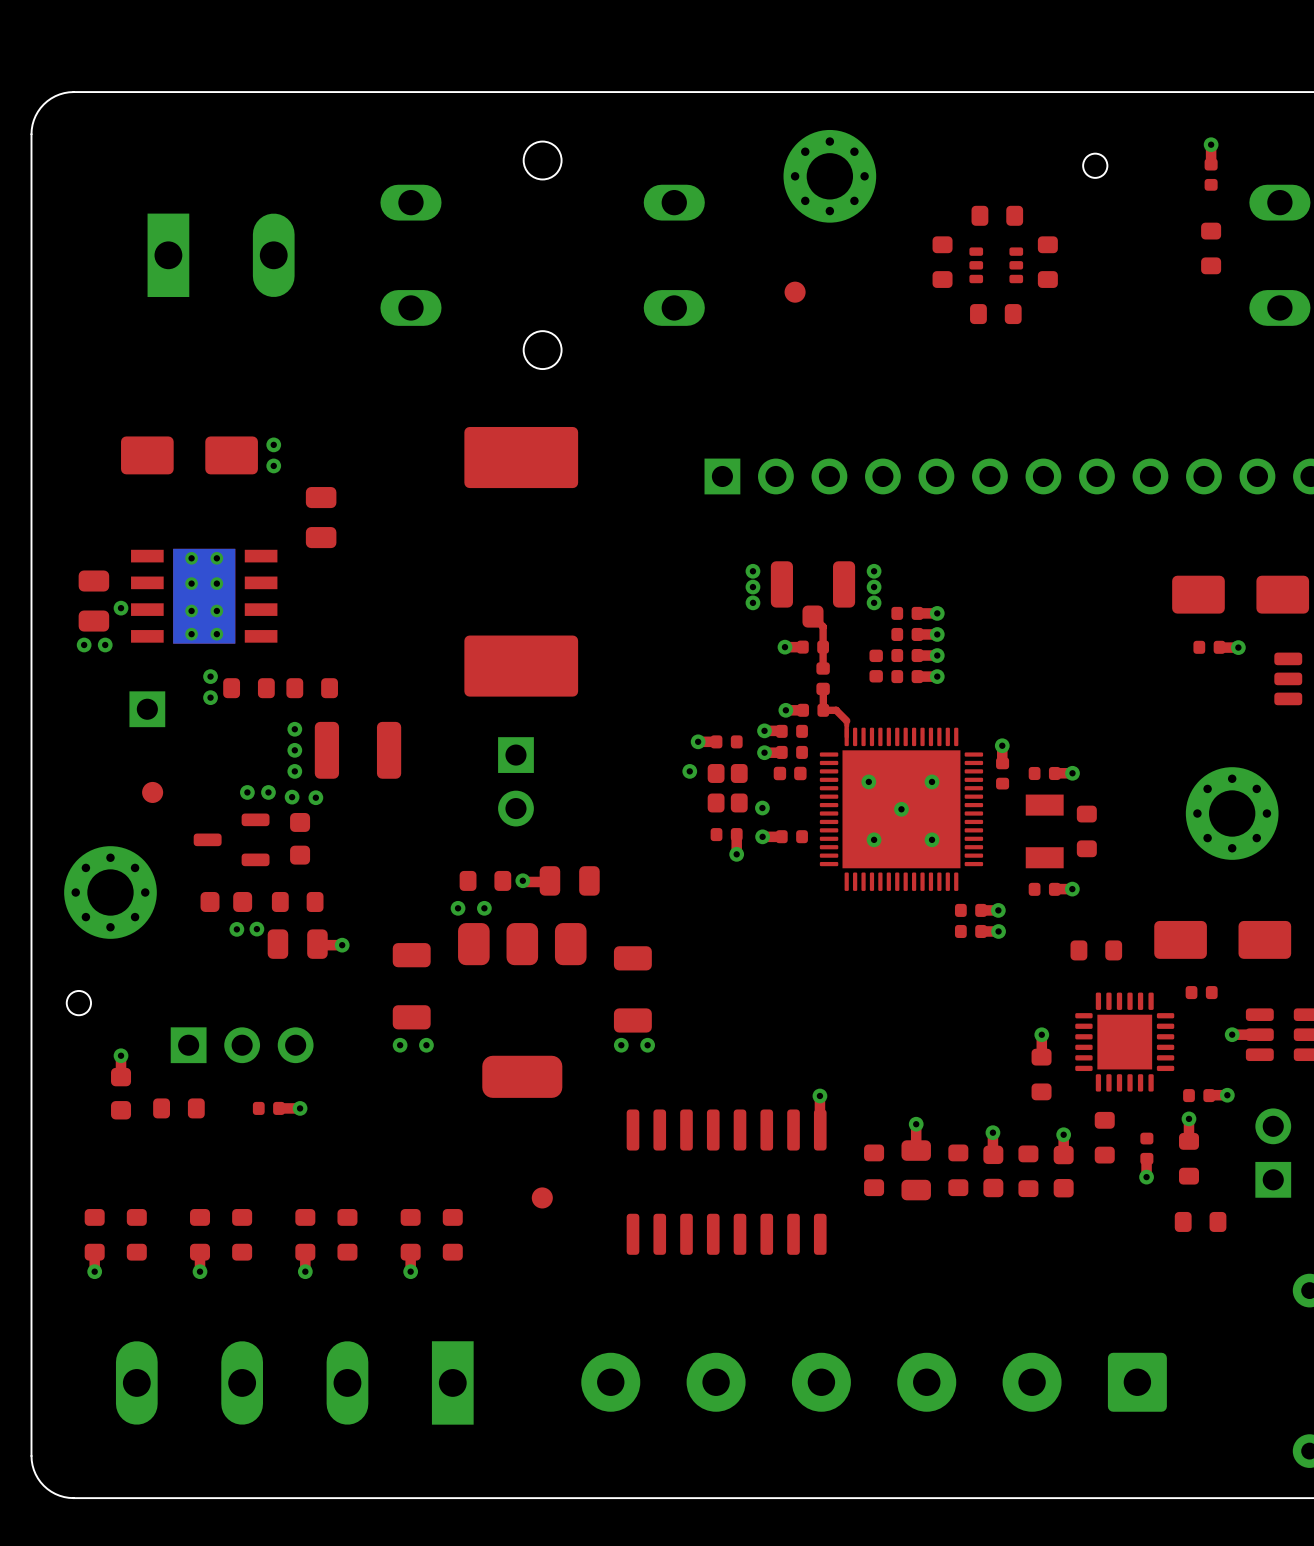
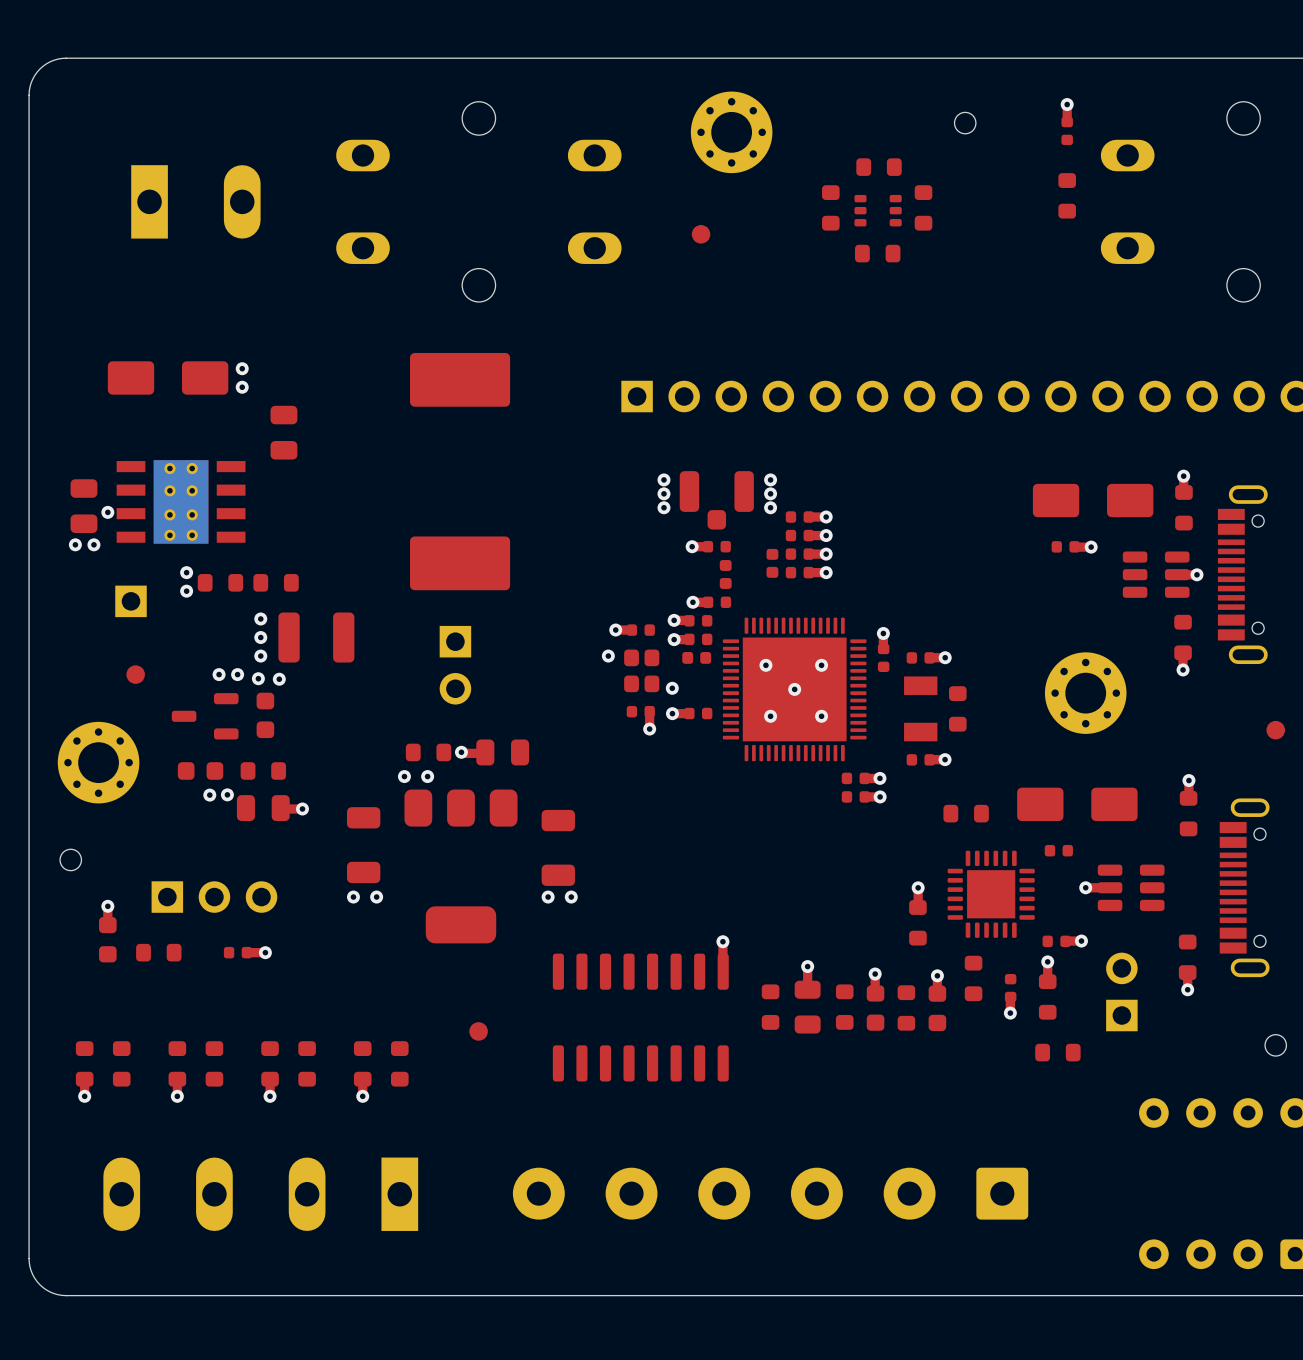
top track: (812, 616) (823, 626) (823, 668) -> none
top track: (823, 689) (823, 710) (836, 710) (846, 720) (846, 736) -> none

